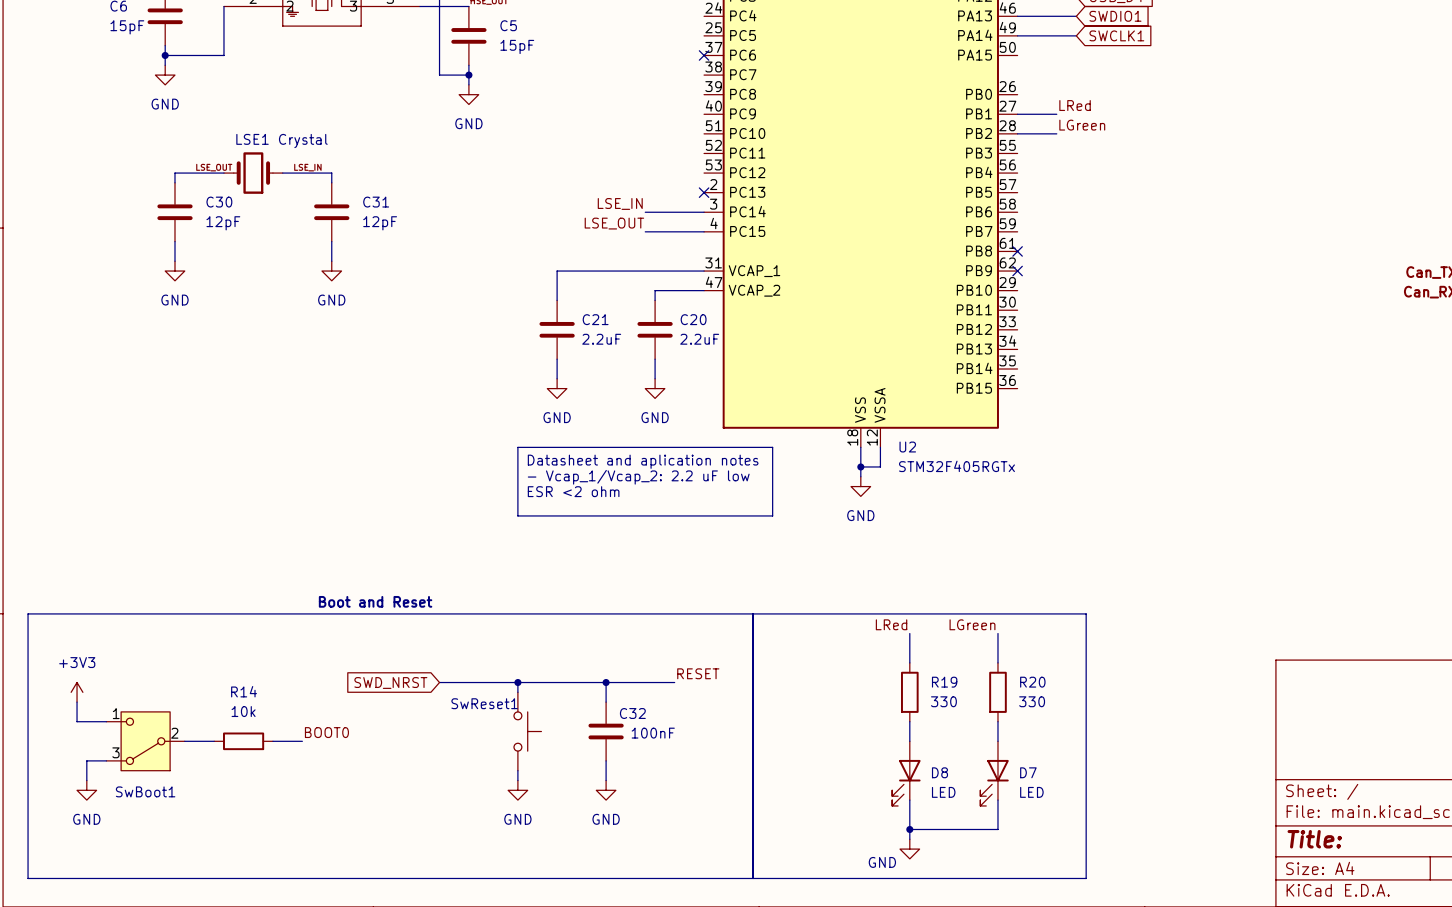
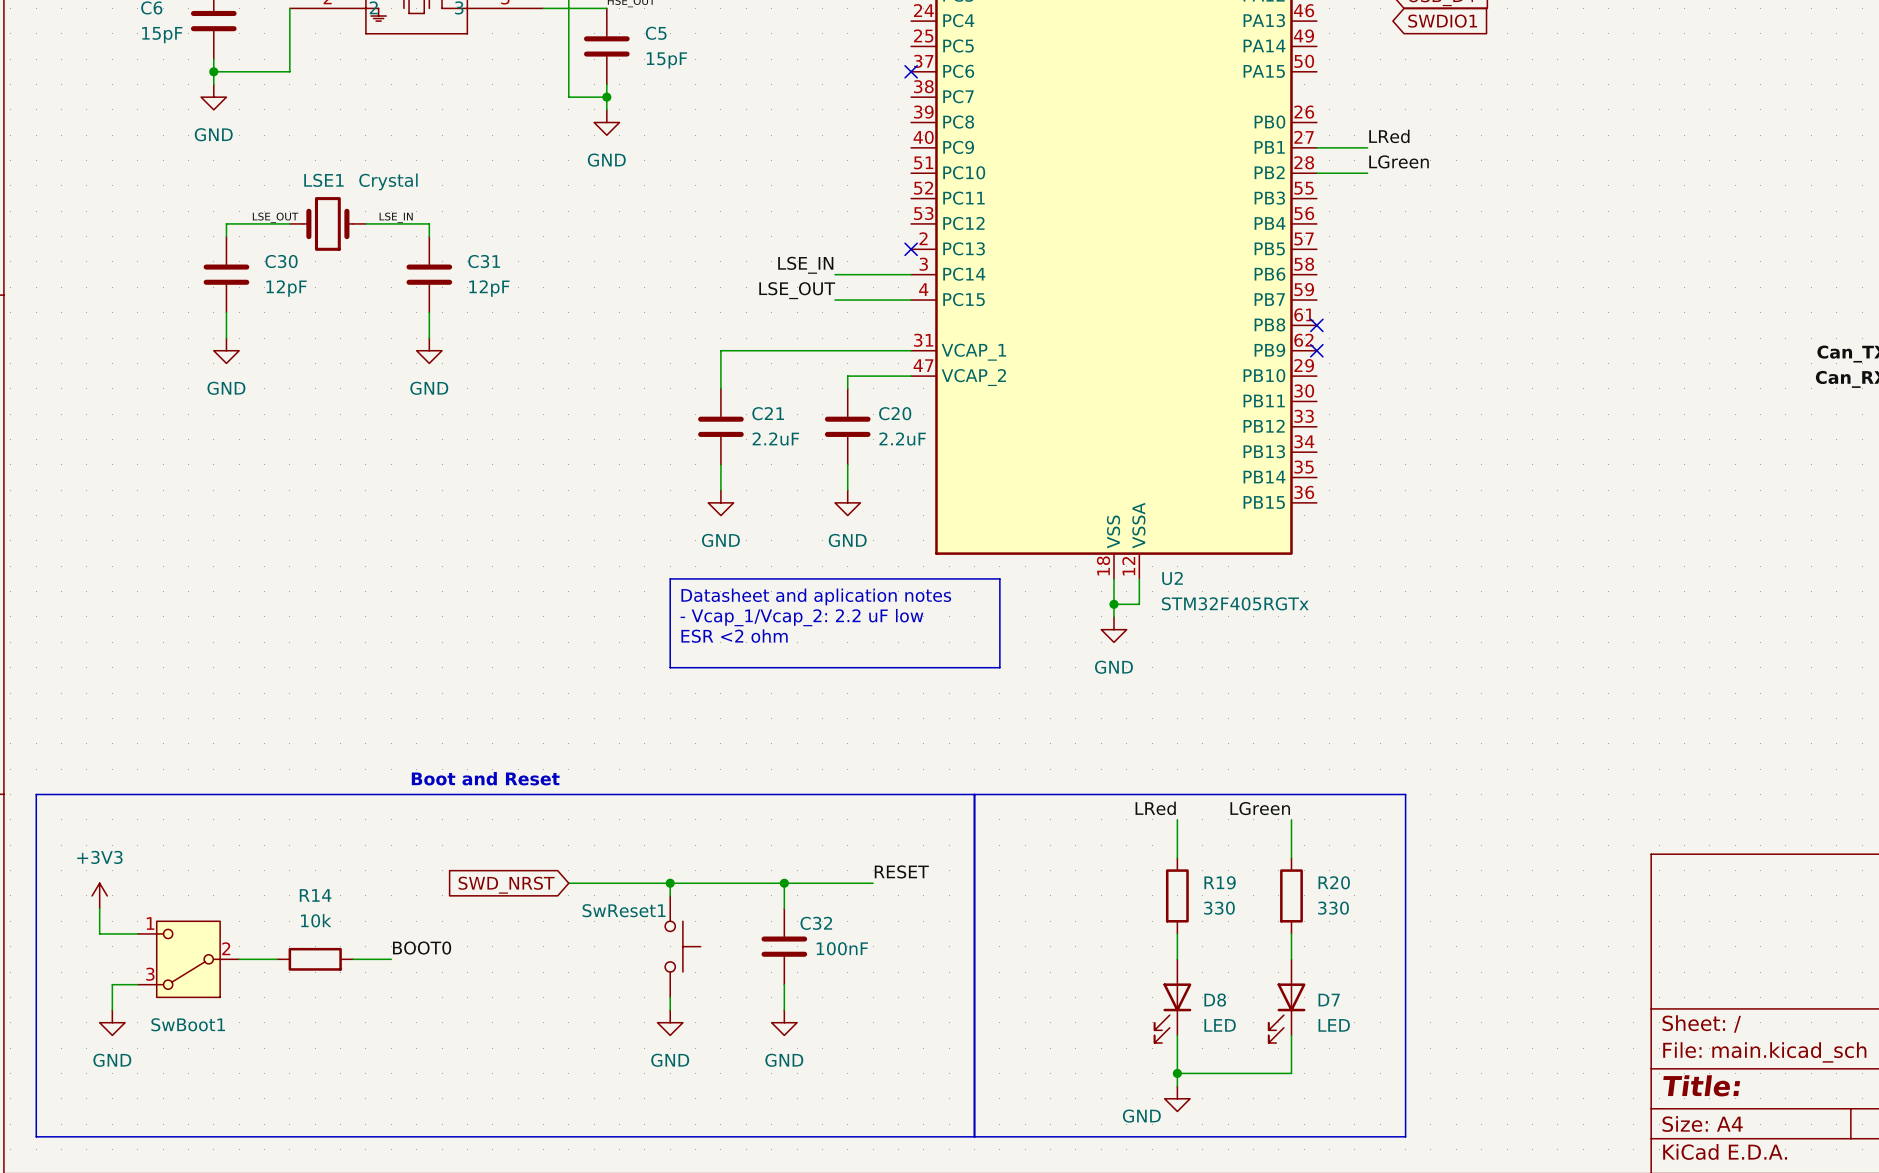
wire: (1017, 16) (1076, 16) -> none
wire: (1017, 35) (1076, 35) -> none
global label: SWCLK1 (1116, 35) -> none

